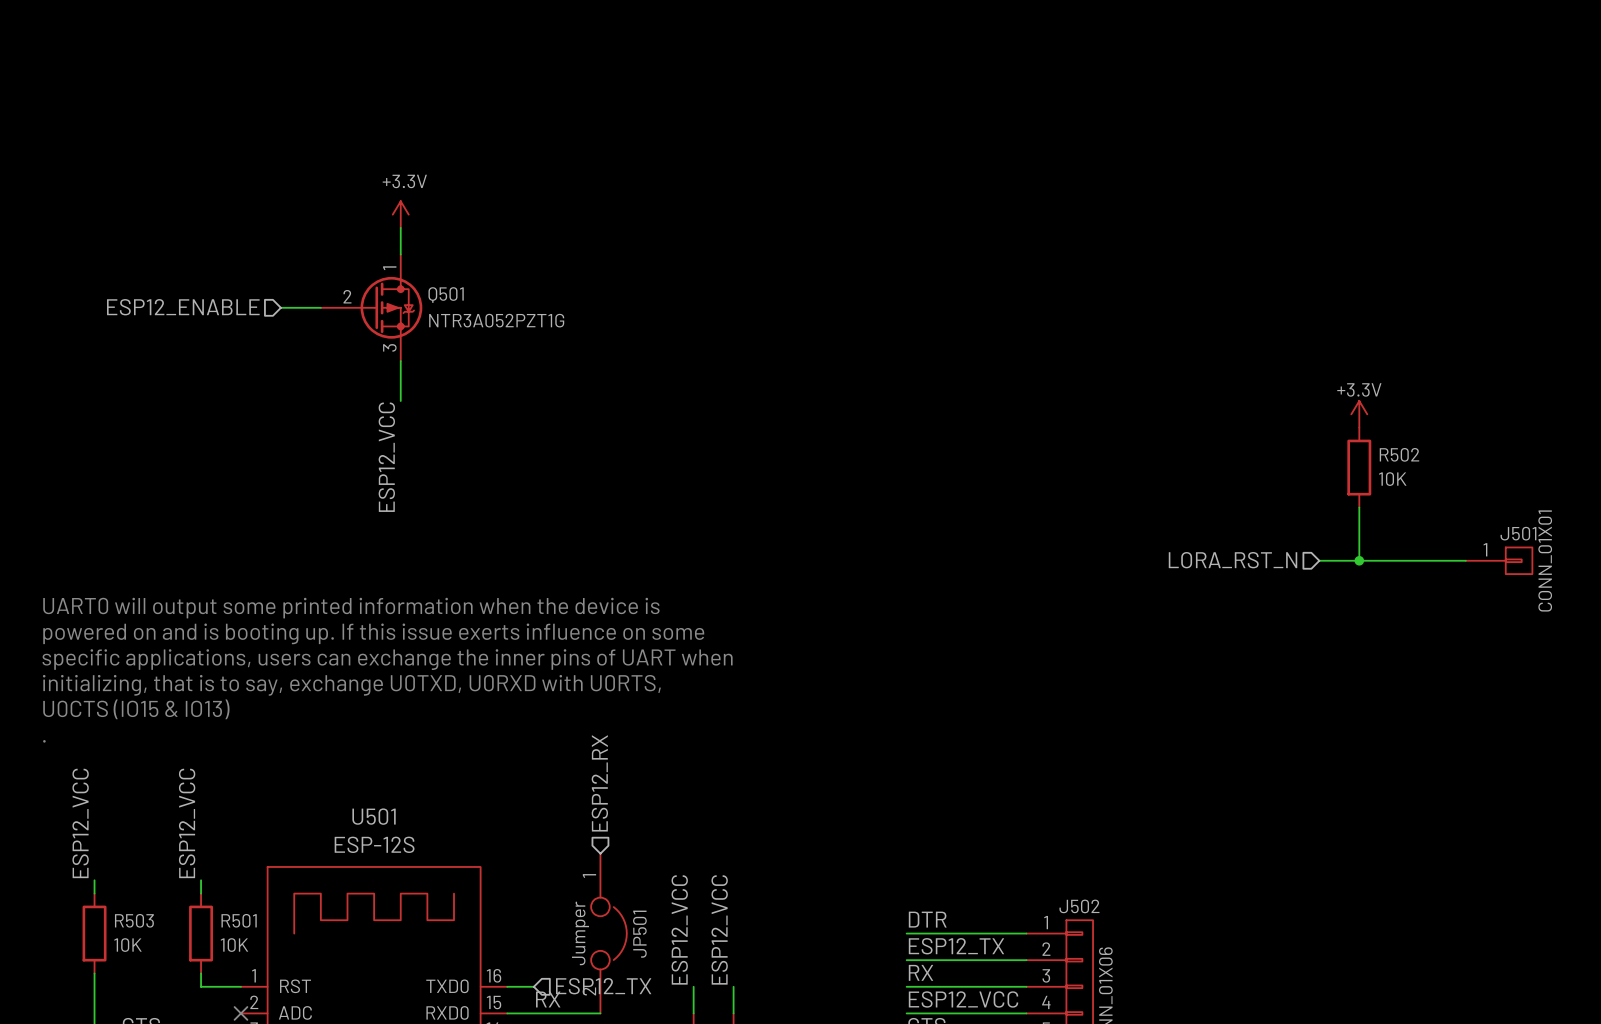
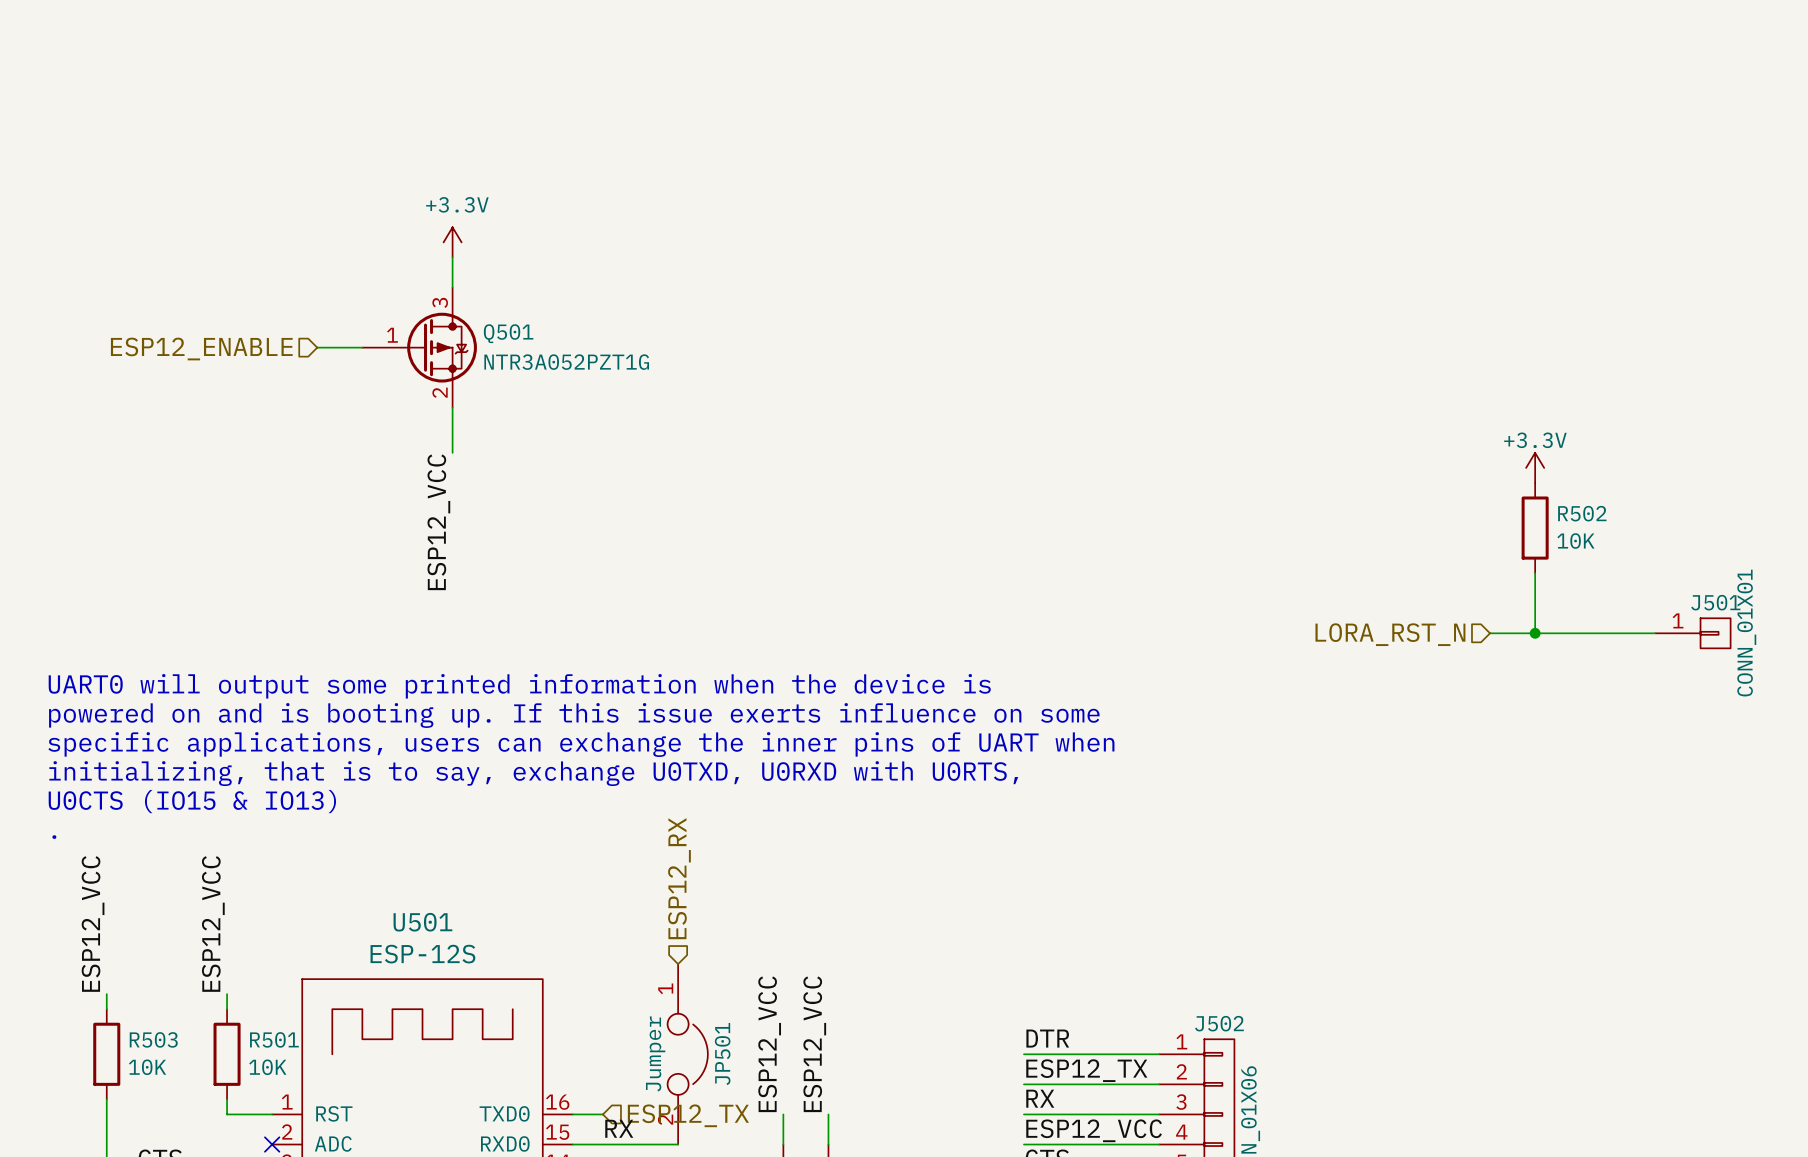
Q501 pin number: 1 (389, 268) -> 3 (440, 302)
Q501 pin number: 2 (347, 296) -> 1 (392, 335)
Q501 pin number: 3 (389, 347) -> 2 (440, 392)

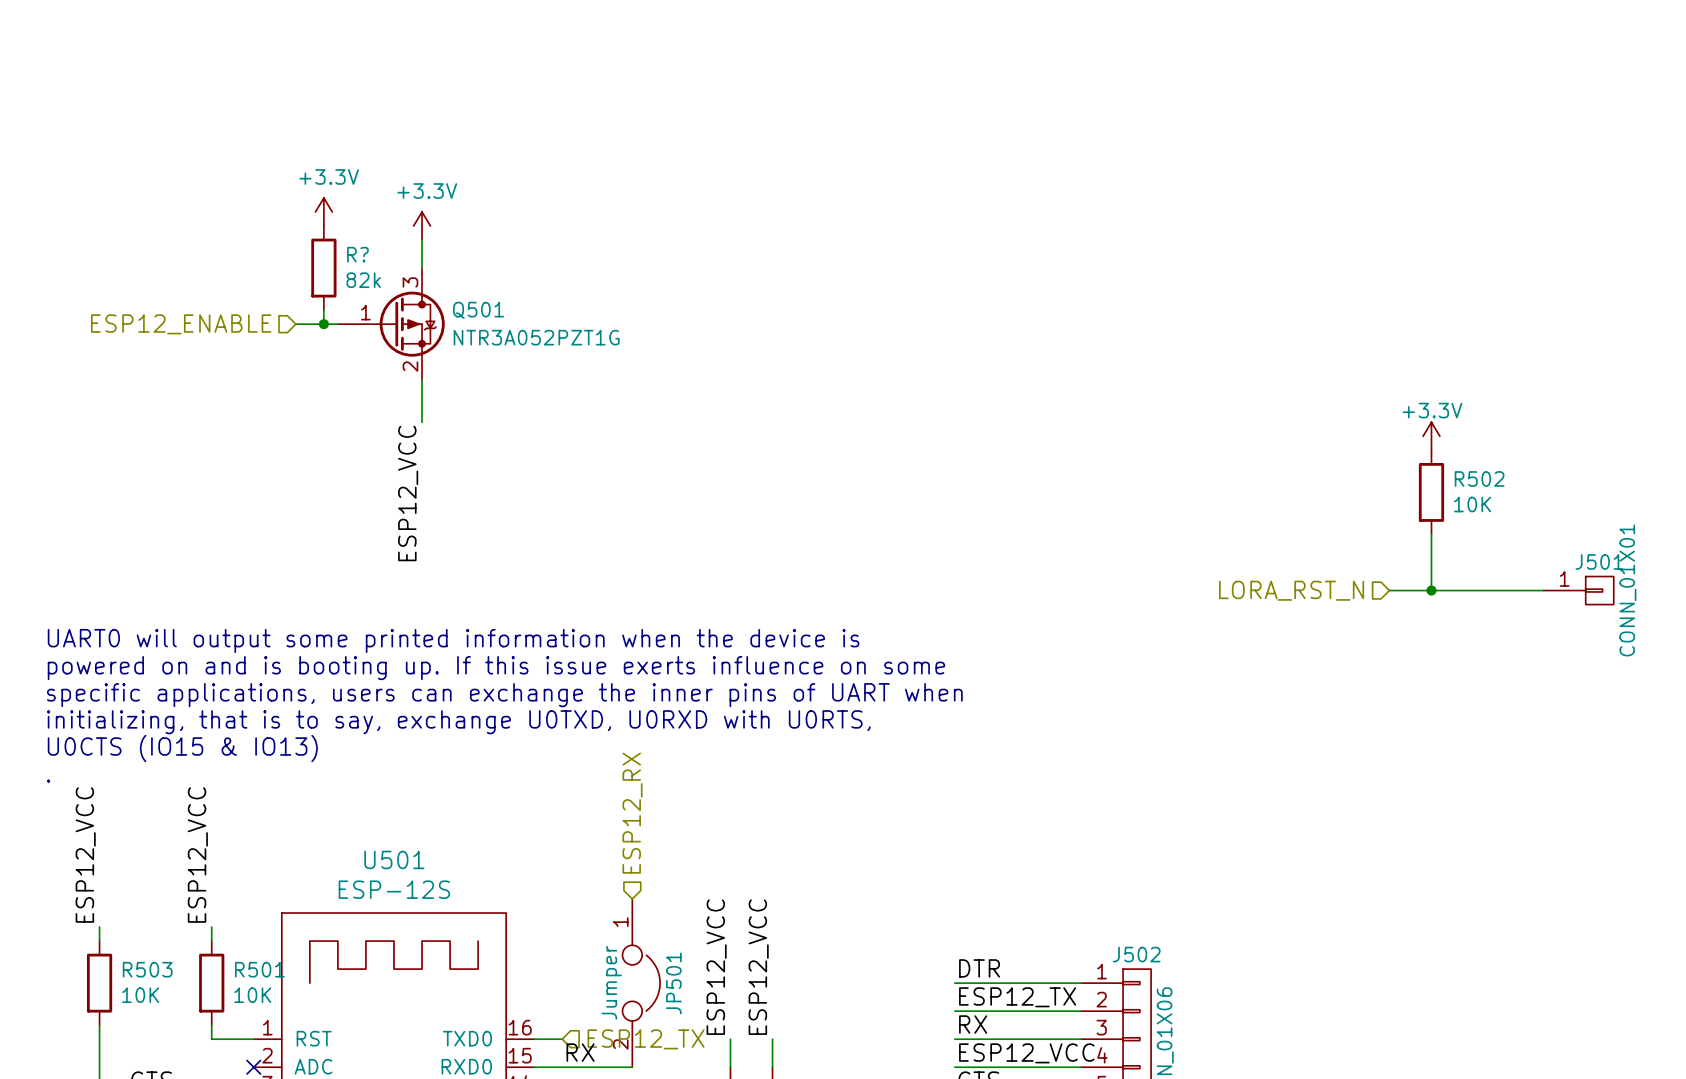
power symbol: none -> +3.3V (323, 212)
R?: none -> 82k (323, 268)
wire: none -> (323, 310) (323, 324)
junction: none -> (323, 324)

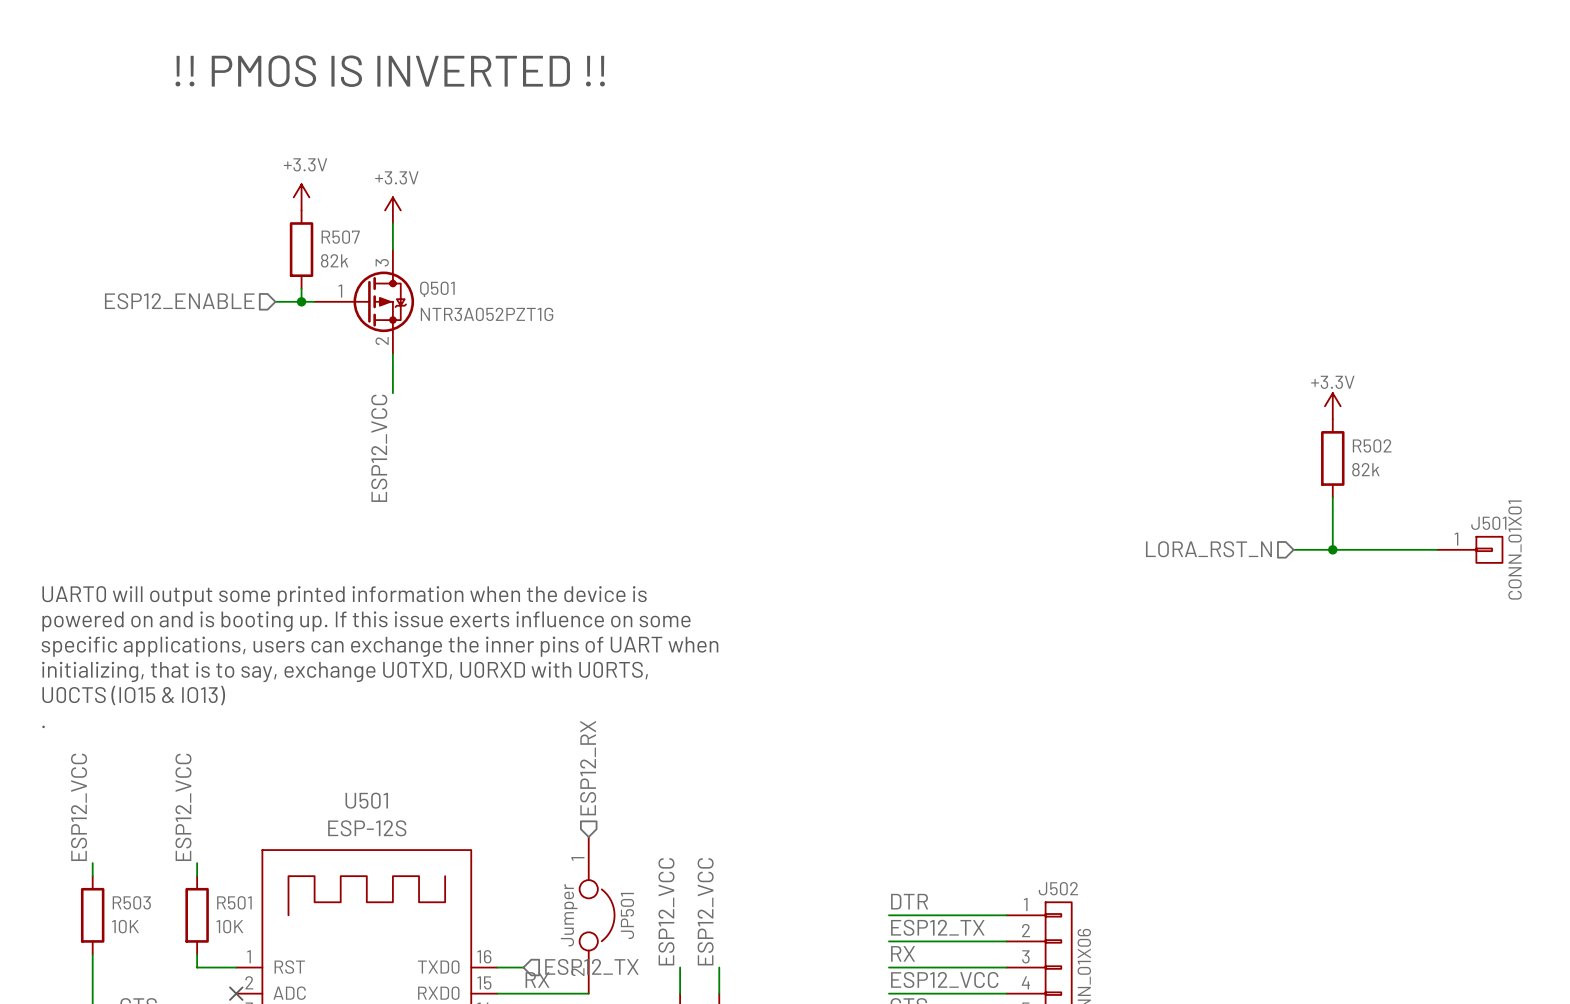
text: none -> !! PMOS IS INVERTED !! (390, 71)
R? name: R? (357, 254) -> R507 (340, 237)
R502 value: 10K (1472, 504) -> 82k (1365, 469)

